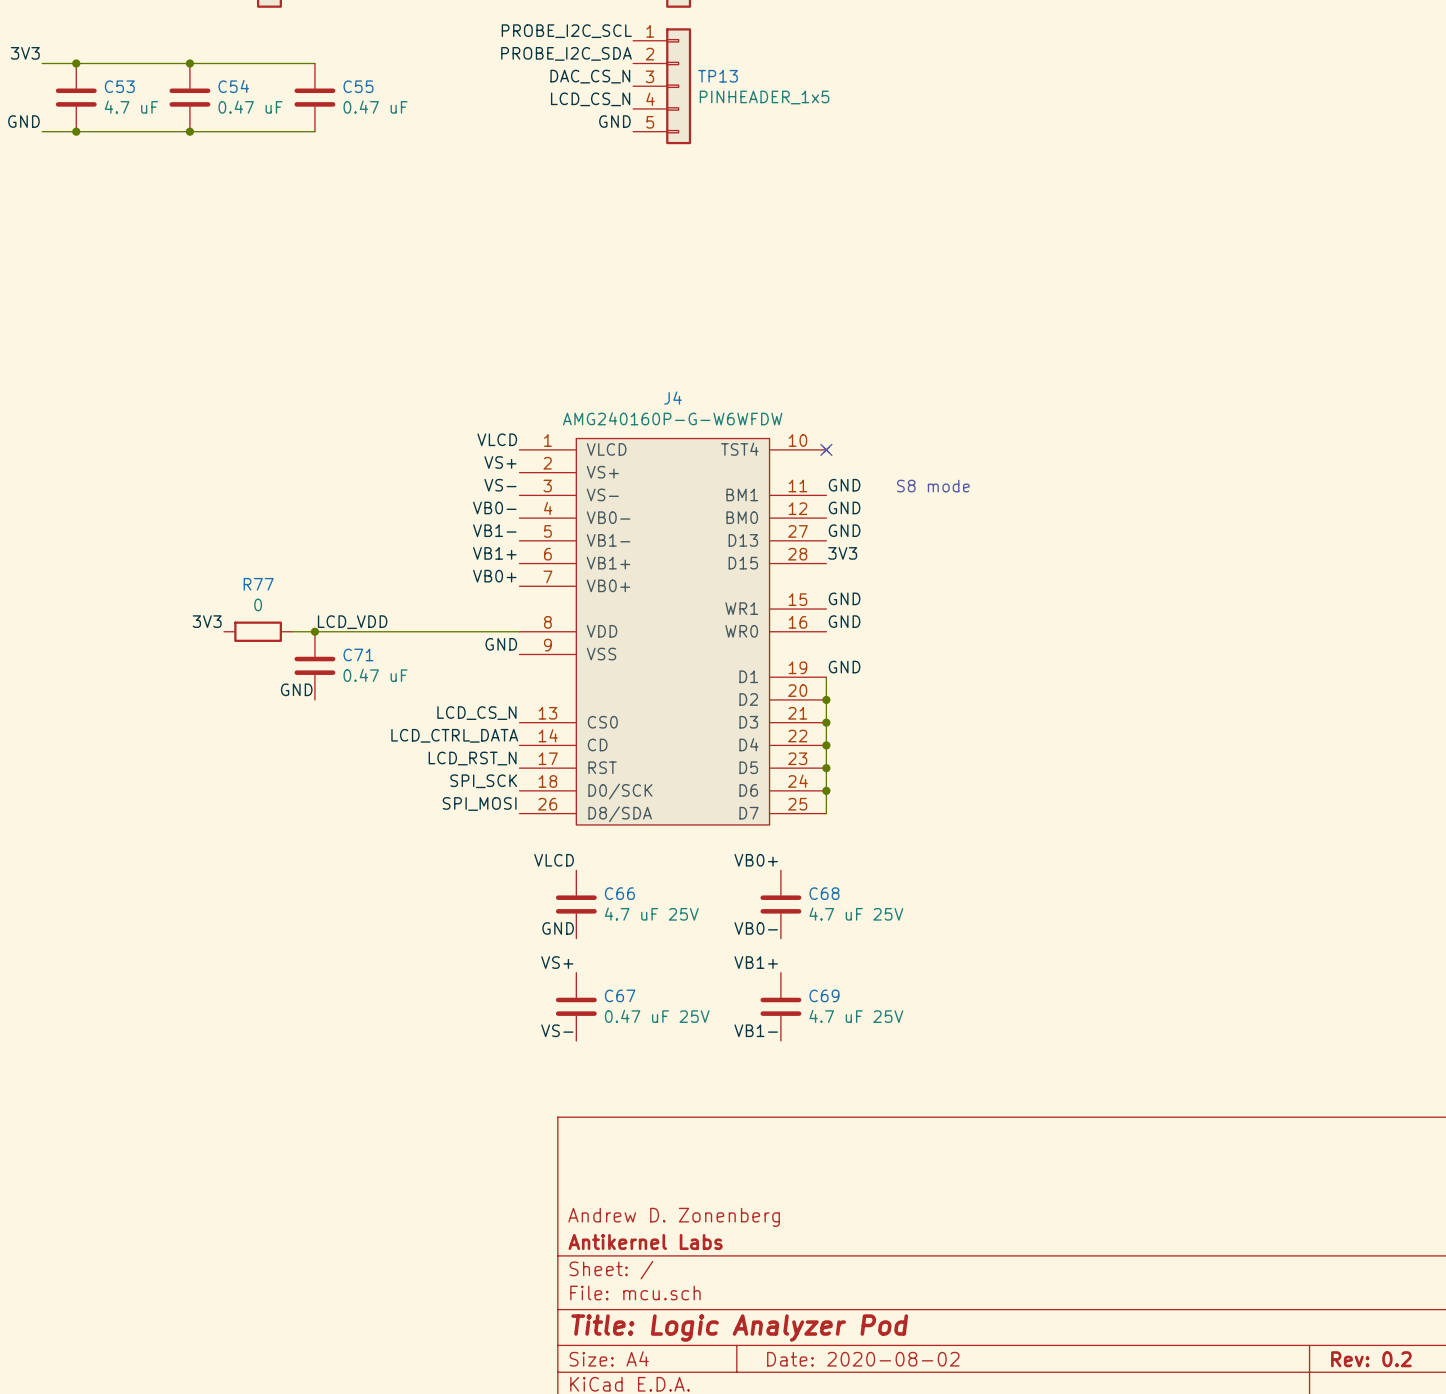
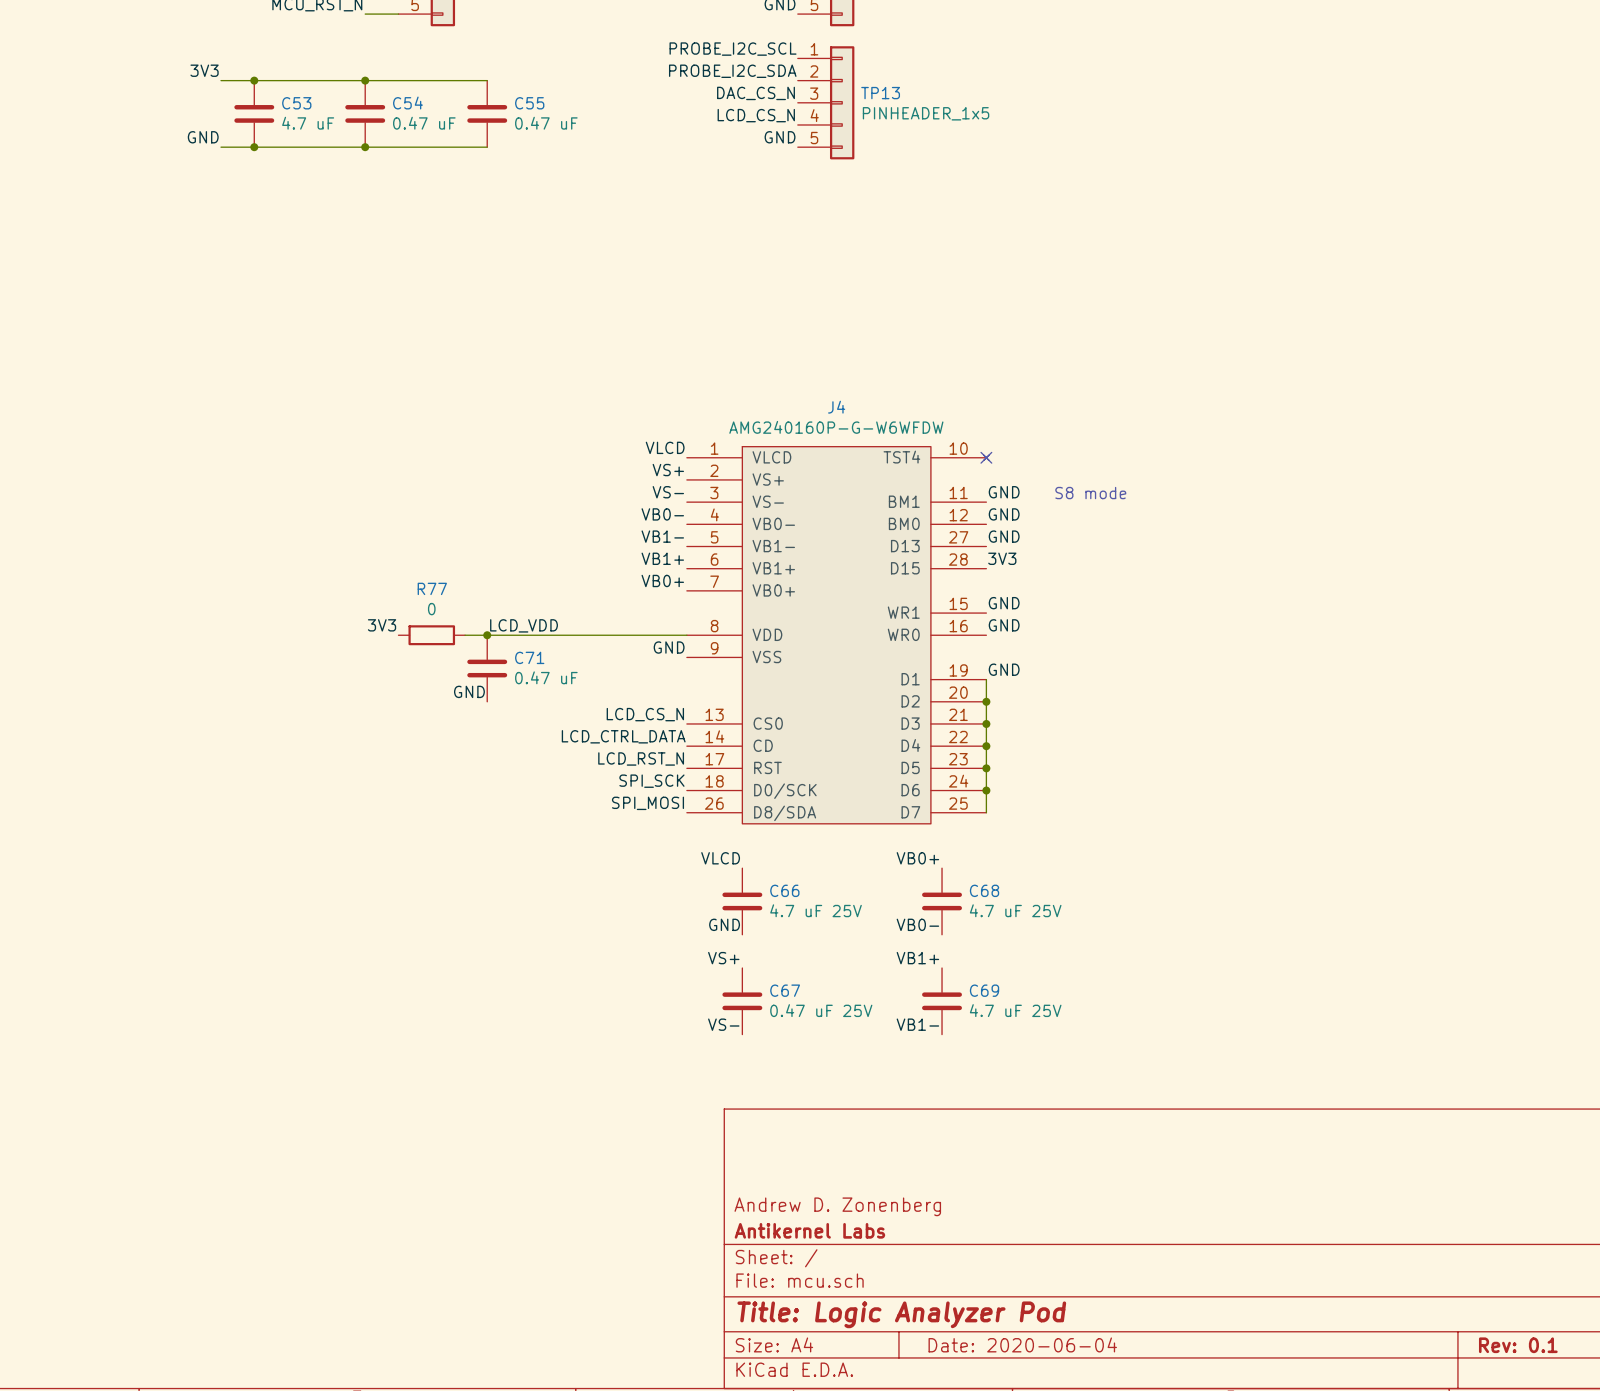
title block: Date: 2020-08-02 (863, 1359) -> Date: 2020-06-04 (1022, 1344)
title block: Rev: 0.2 (1371, 1359) -> Rev: 0.1 (1518, 1345)

